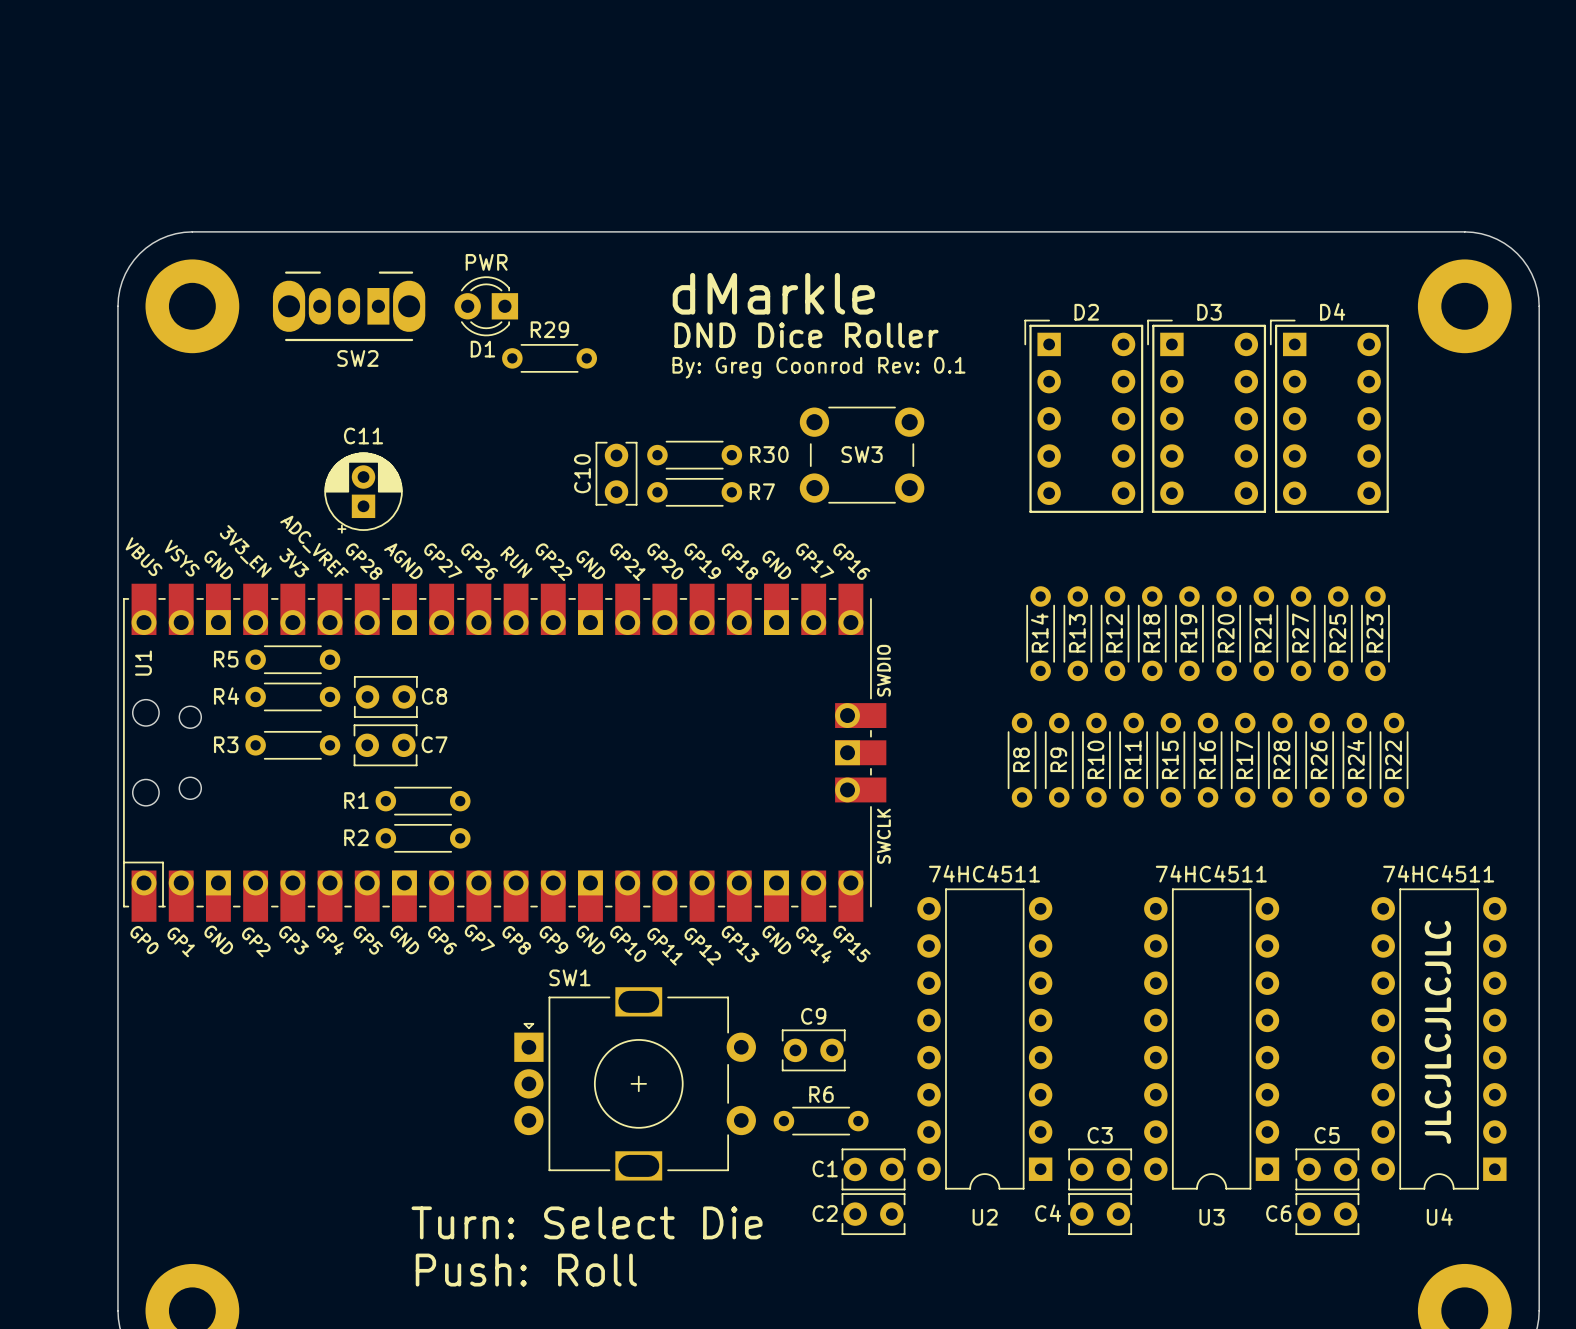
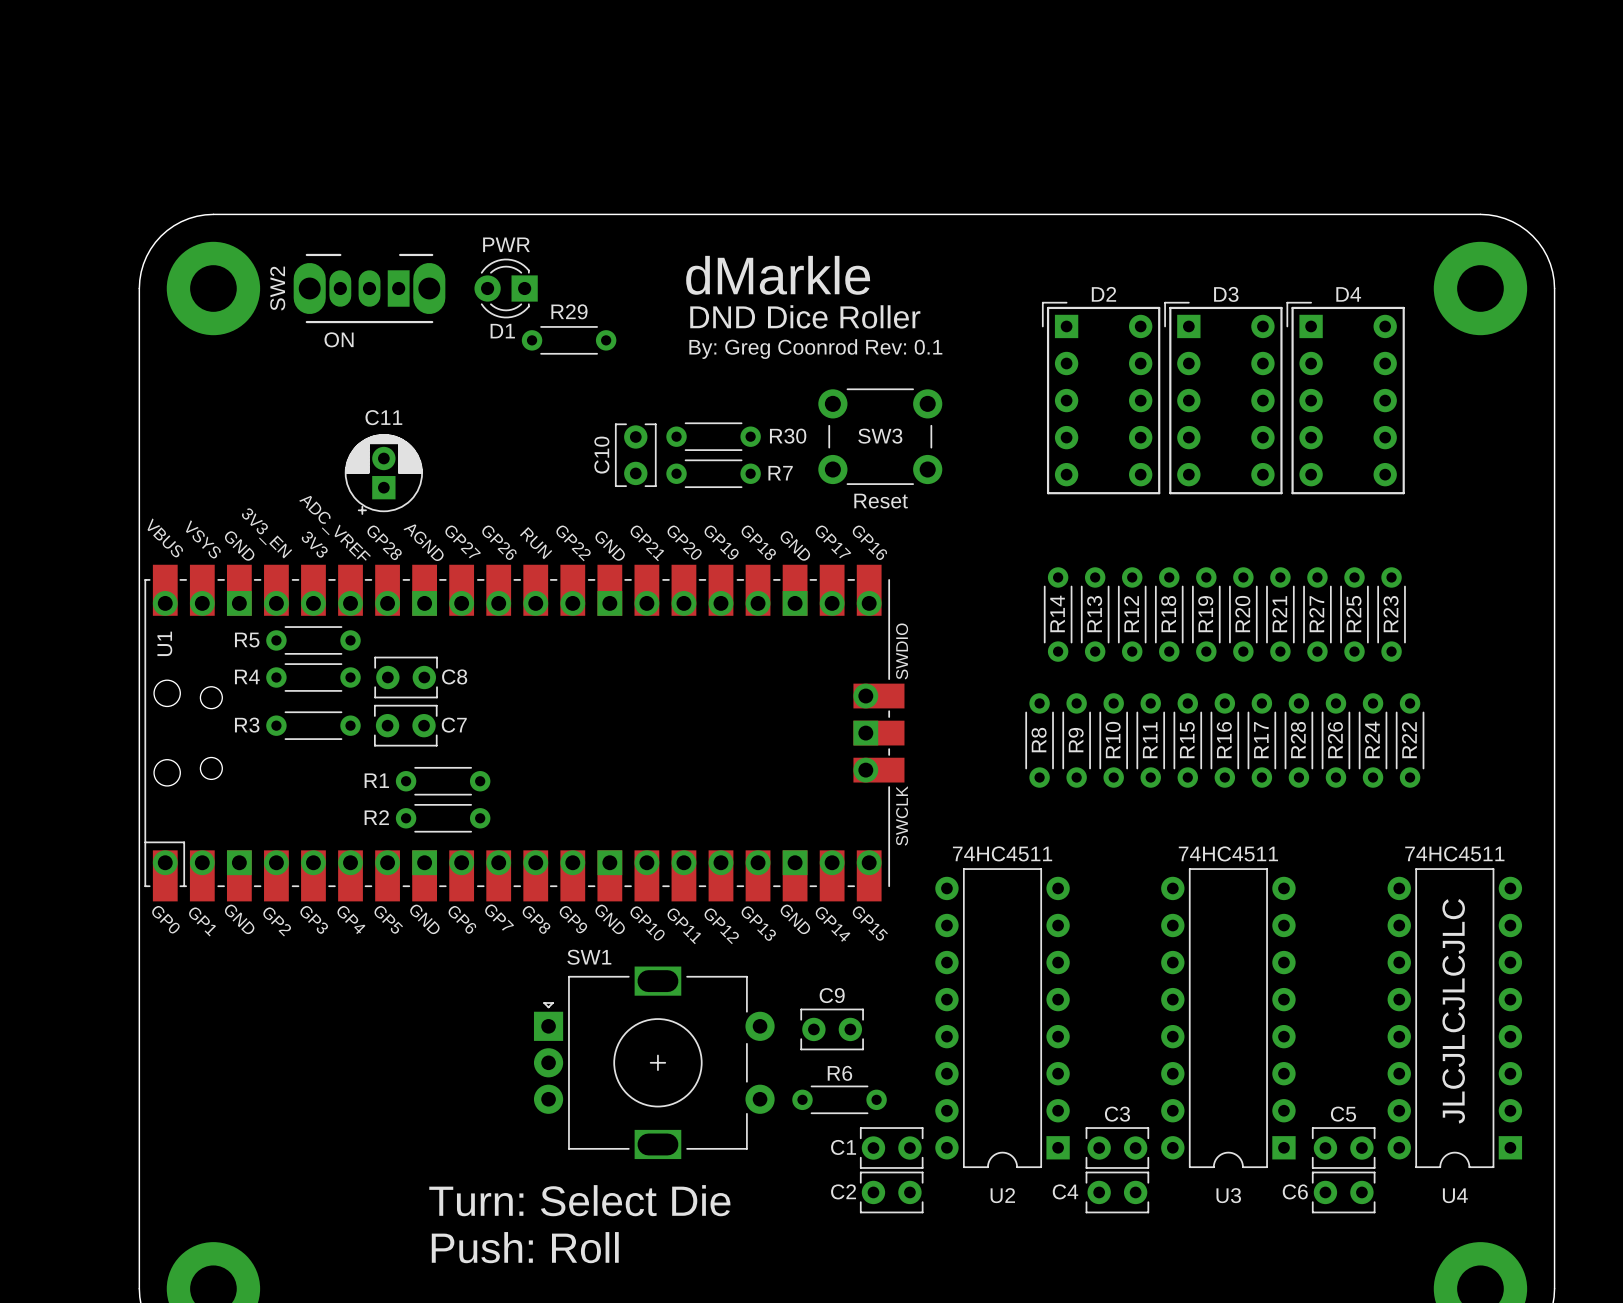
text: none -> ON (339, 339)
SW2 name rotation: 0° (357, 358) -> 90° counterclockwise (277, 288)
SW2 name position: SW2 (357, 358) -> SW2 (277, 288)
text: none -> Reset (881, 501)

